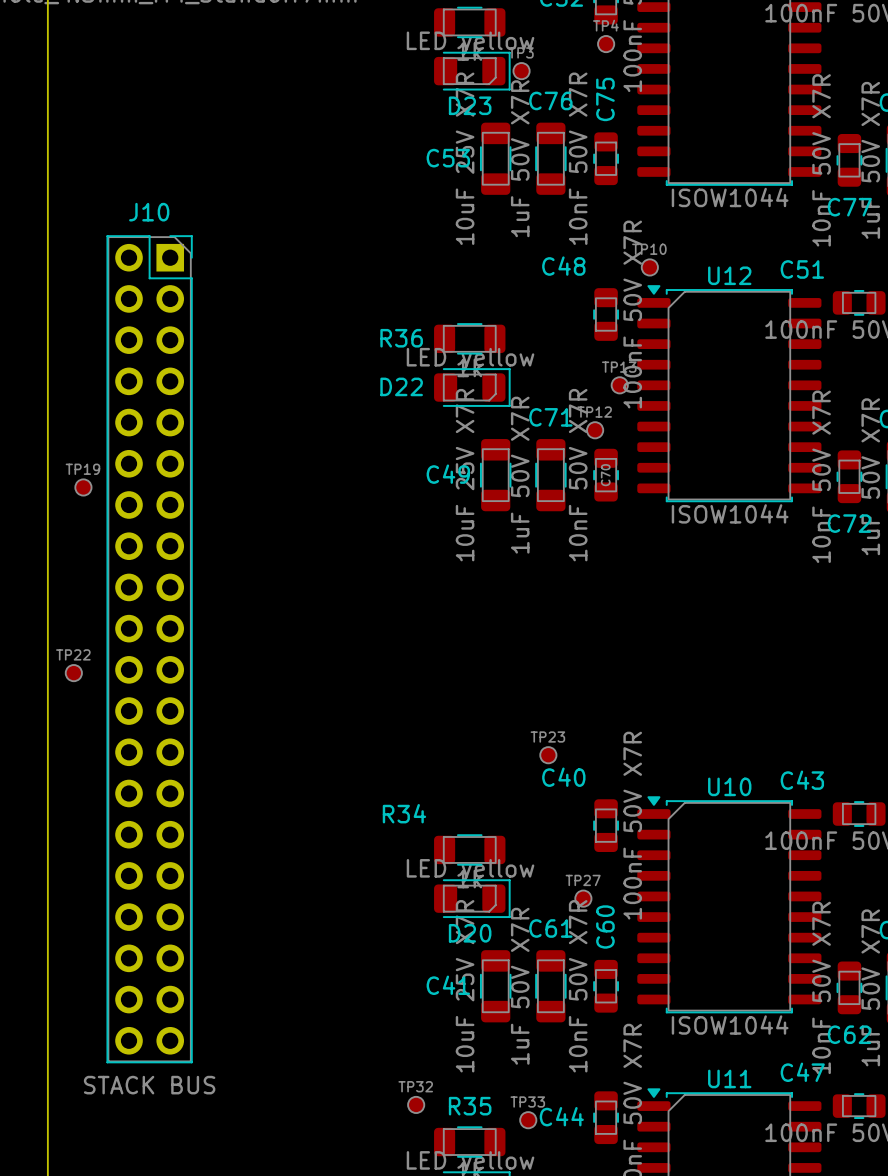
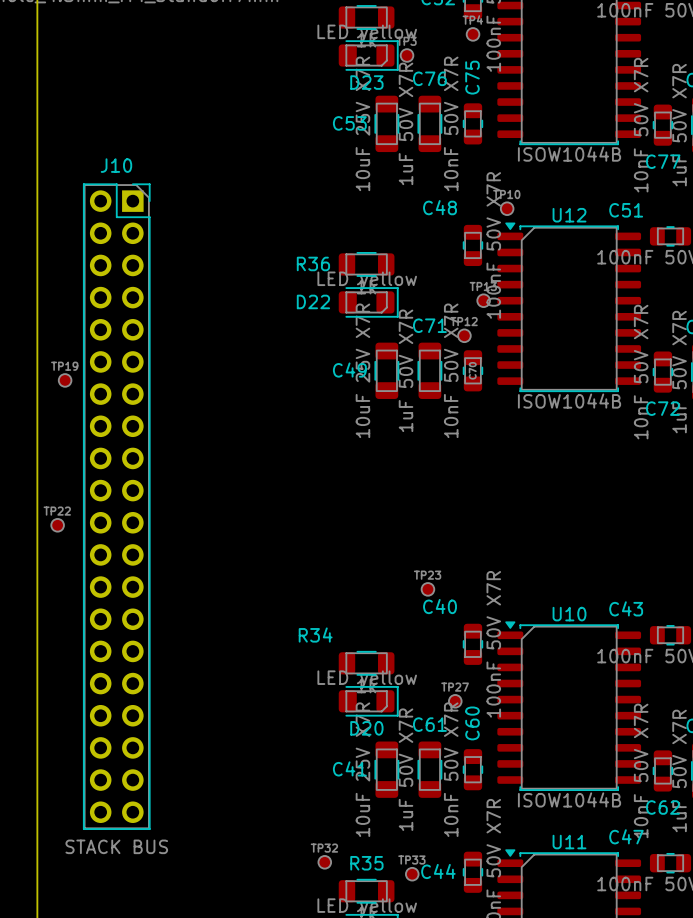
part value: ISOW1044 (730, 197) -> ISOW1044B (569, 154)
U12 value: ISOW1044 (730, 513) -> ISOW1044B (569, 401)
U10 value: ISOW1044 (730, 1025) -> ISOW1044B (569, 799)

